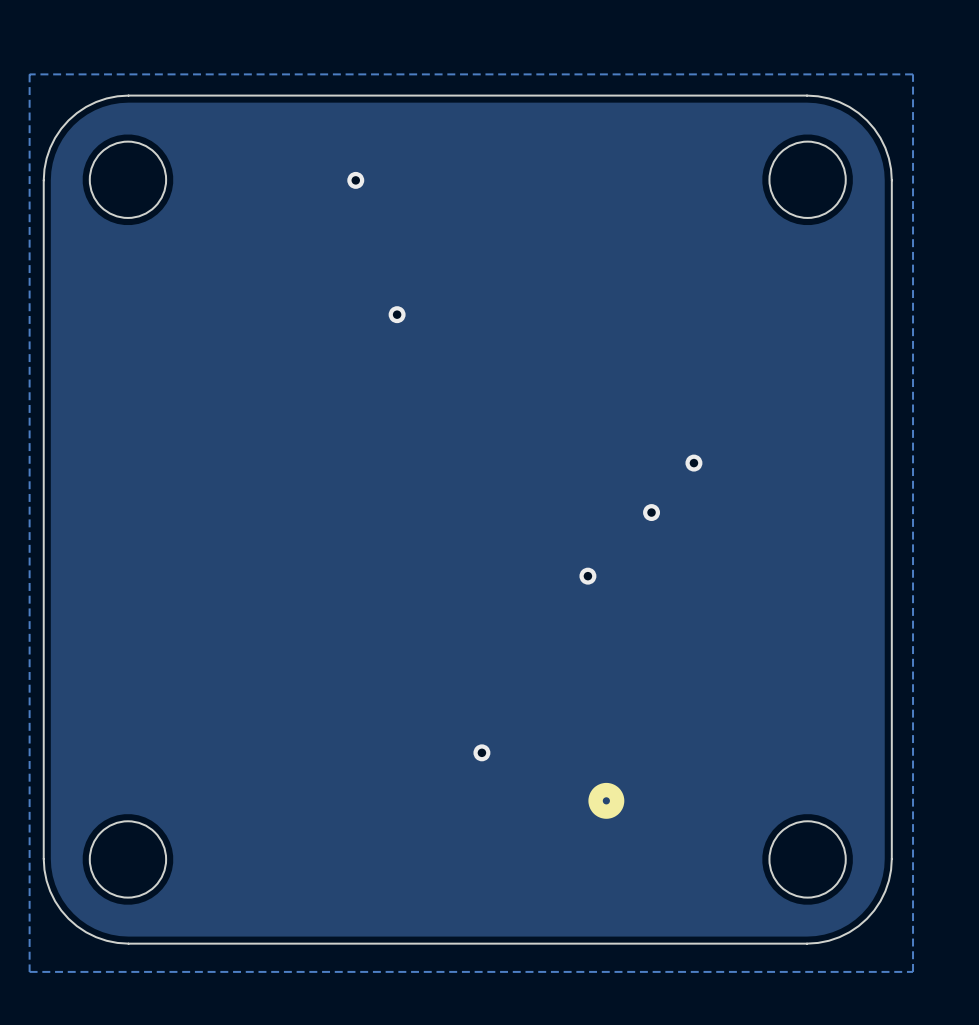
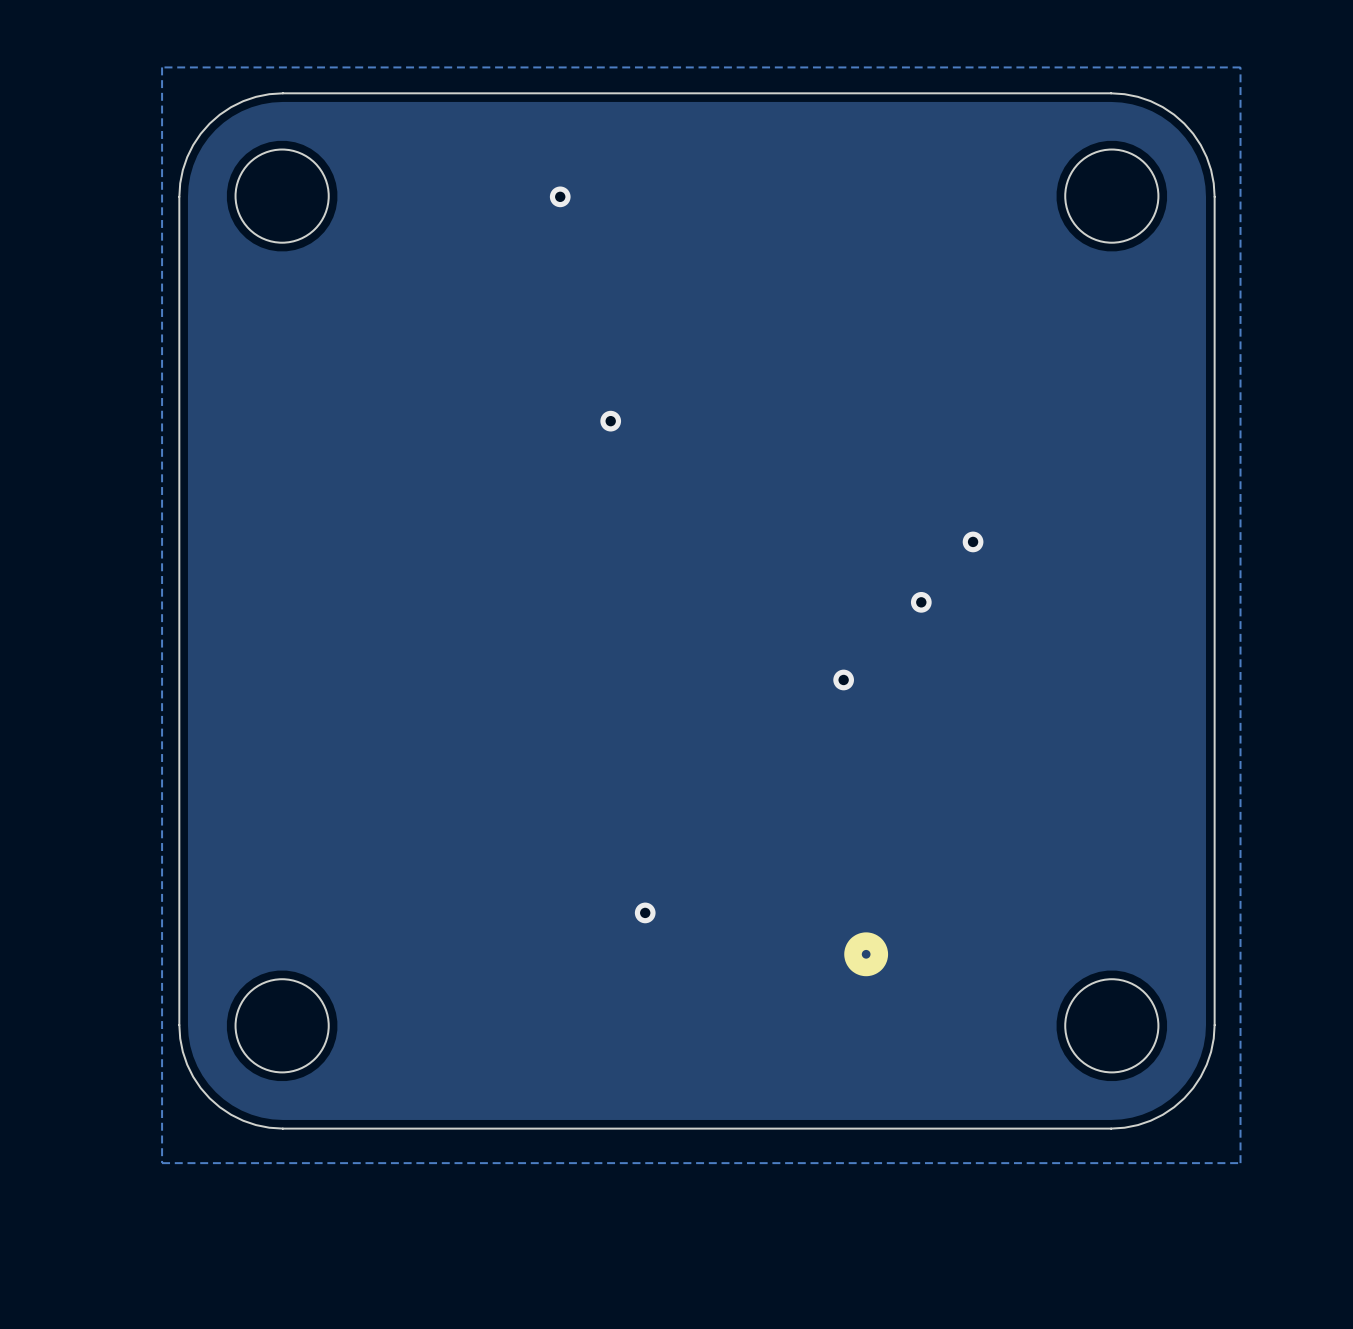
via position: (397, 314) -> (610, 421)
via position: (481, 752) -> (645, 912)

